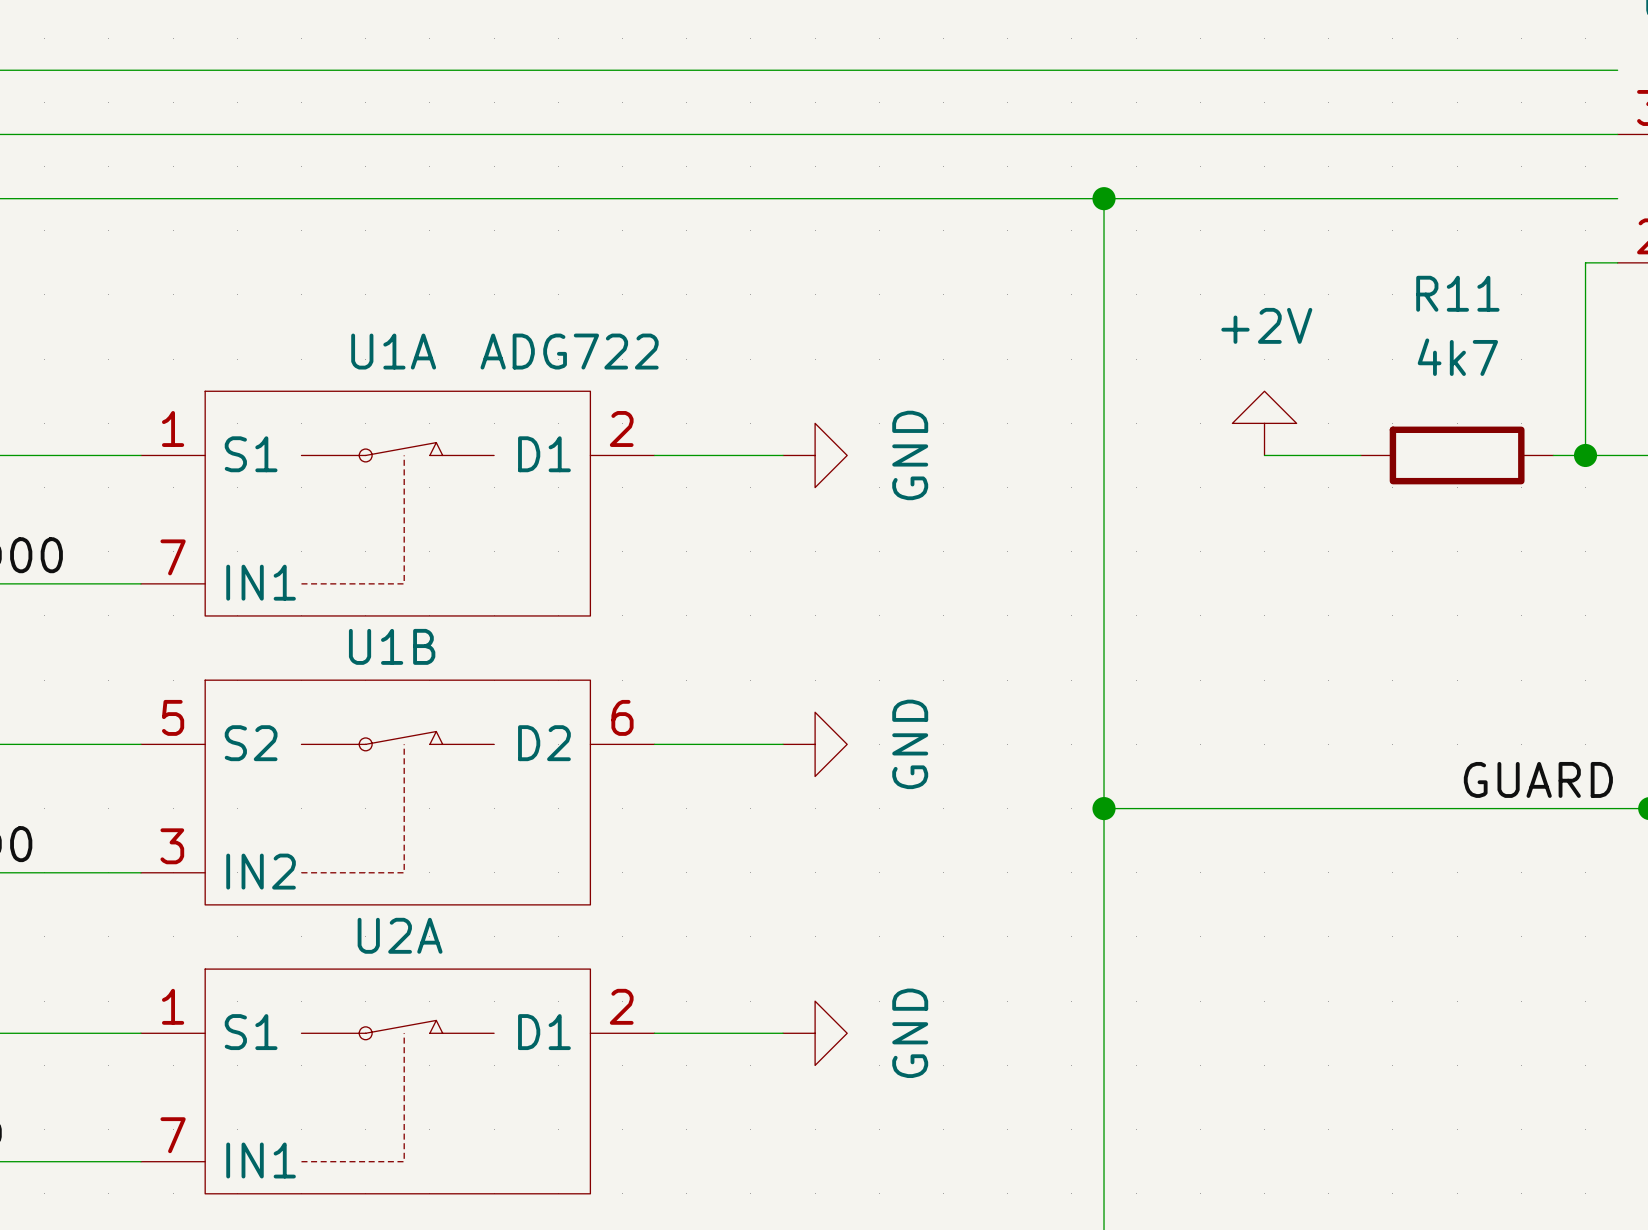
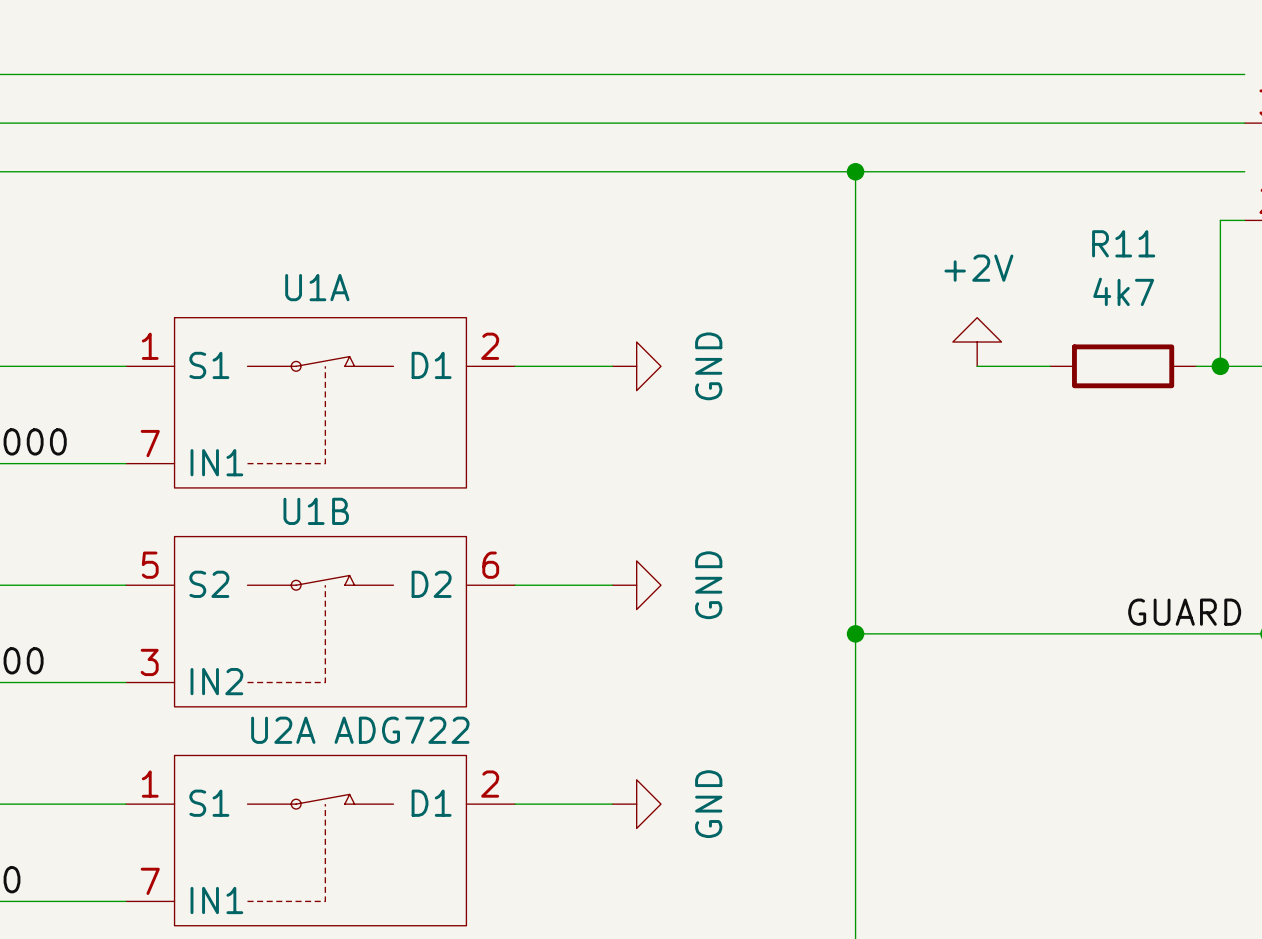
U2A value position: ADG722 (569, 351) -> ADG722 (402, 730)
U2A name position: U2A (400, 935) -> U2A (283, 730)

